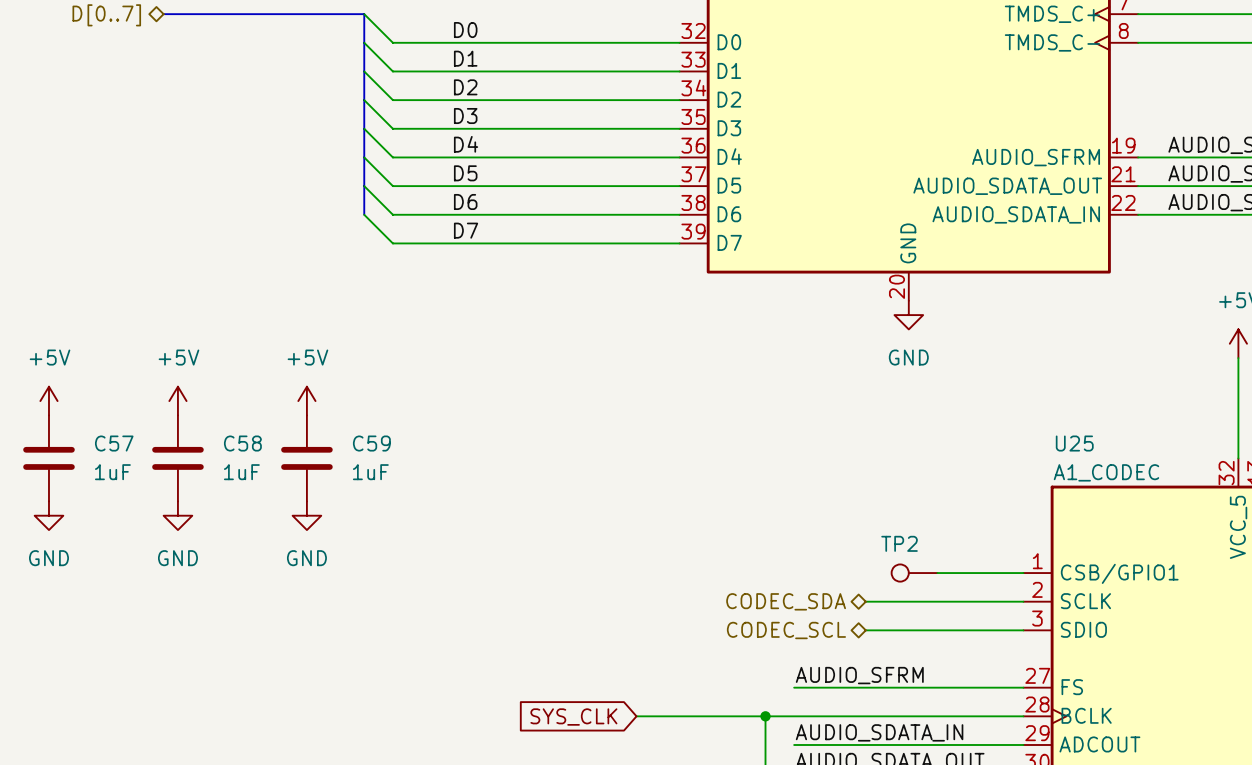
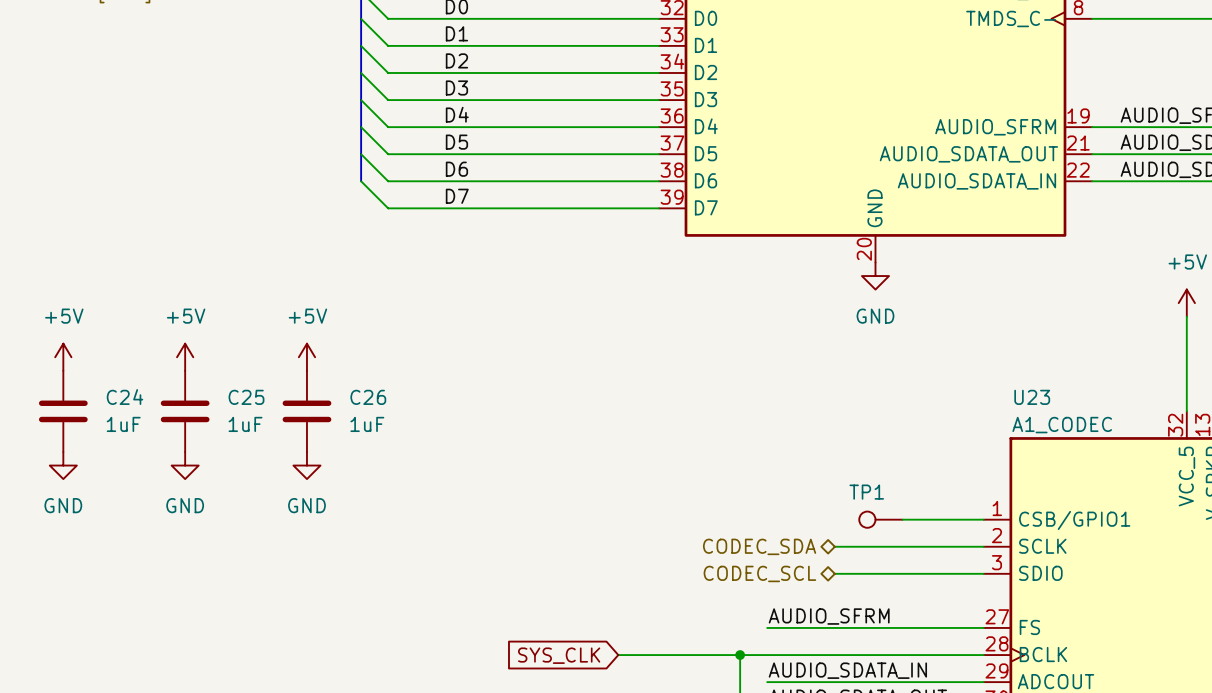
C57 name: C57 (114, 443) -> C24 (124, 397)
C58 name: C58 (242, 443) -> C25 (246, 397)
C59 name: C59 (371, 443) -> C26 (368, 397)
U25 name: U25 (1074, 443) -> U23 (1032, 397)
TP2 name: TP2 (899, 543) -> TP1 (866, 492)

